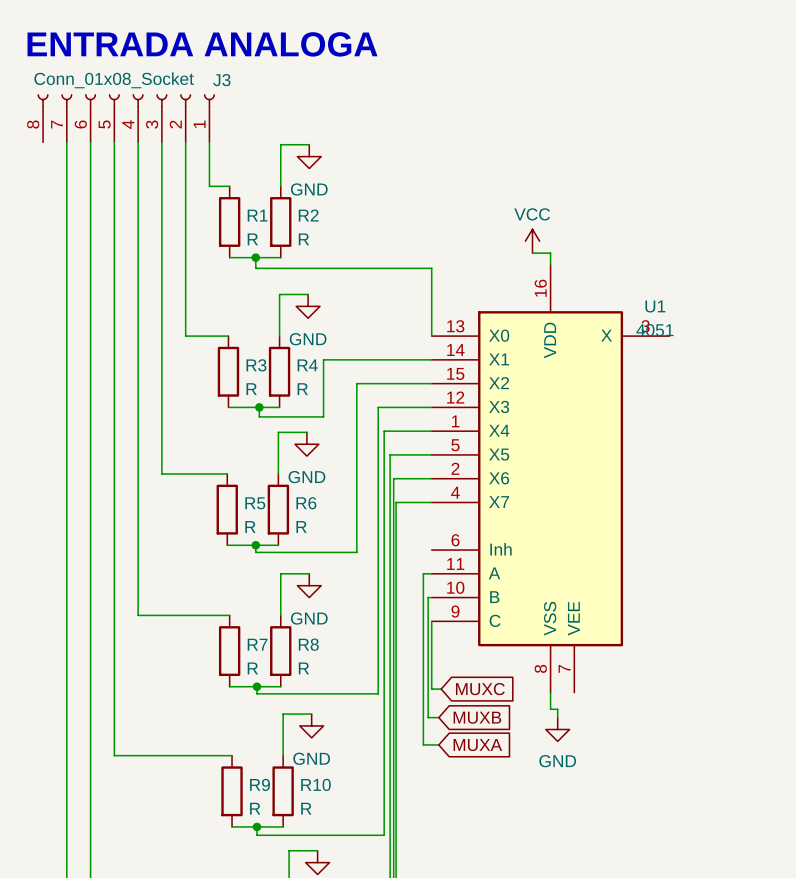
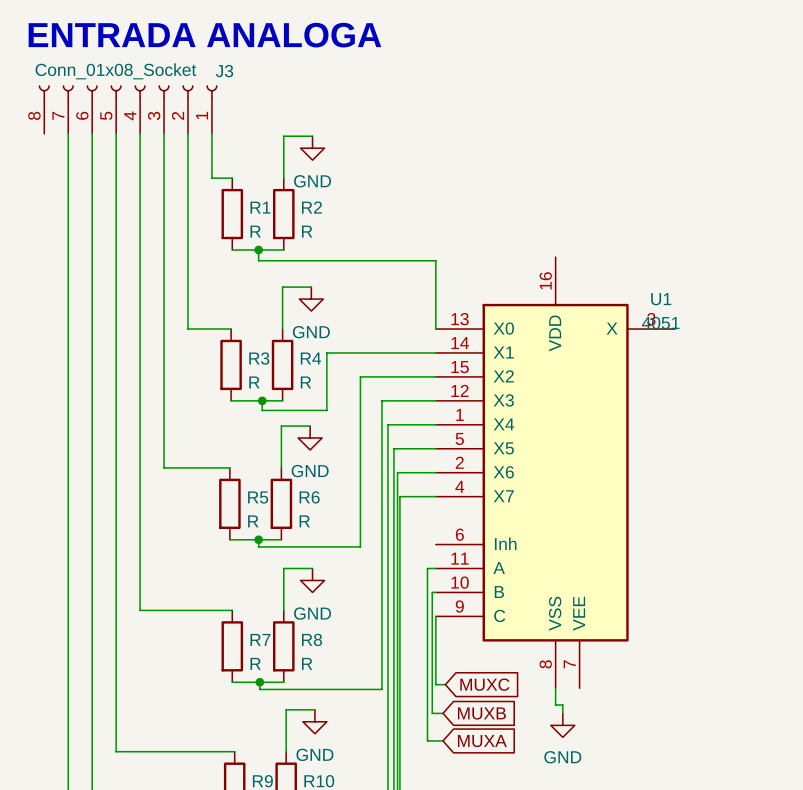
power symbol: VCC (532, 241) -> none
wire: (532, 253) (550, 253) (550, 264) -> none

